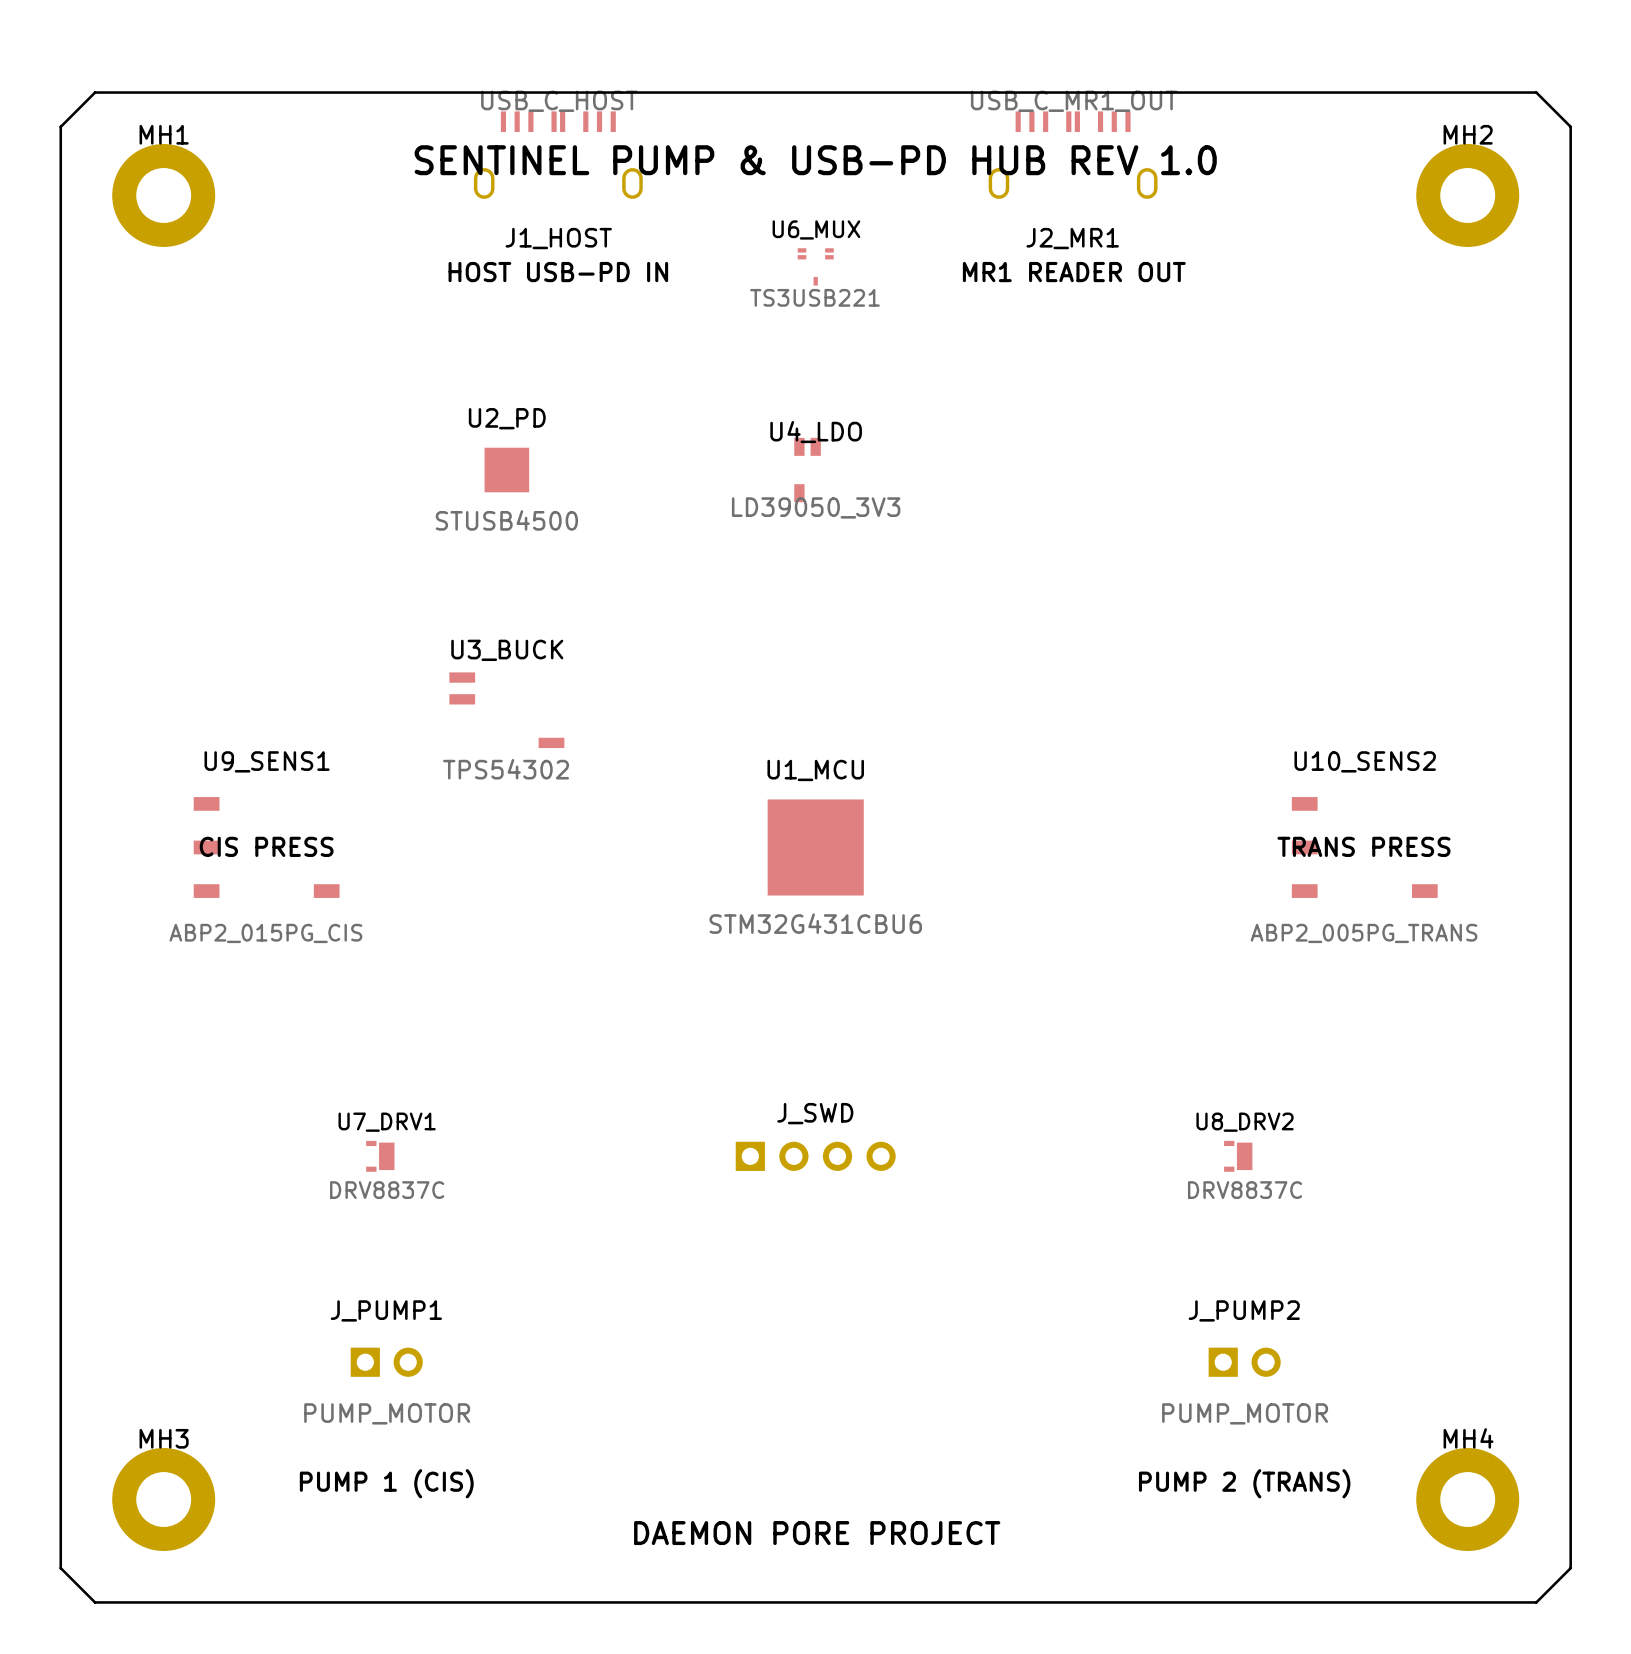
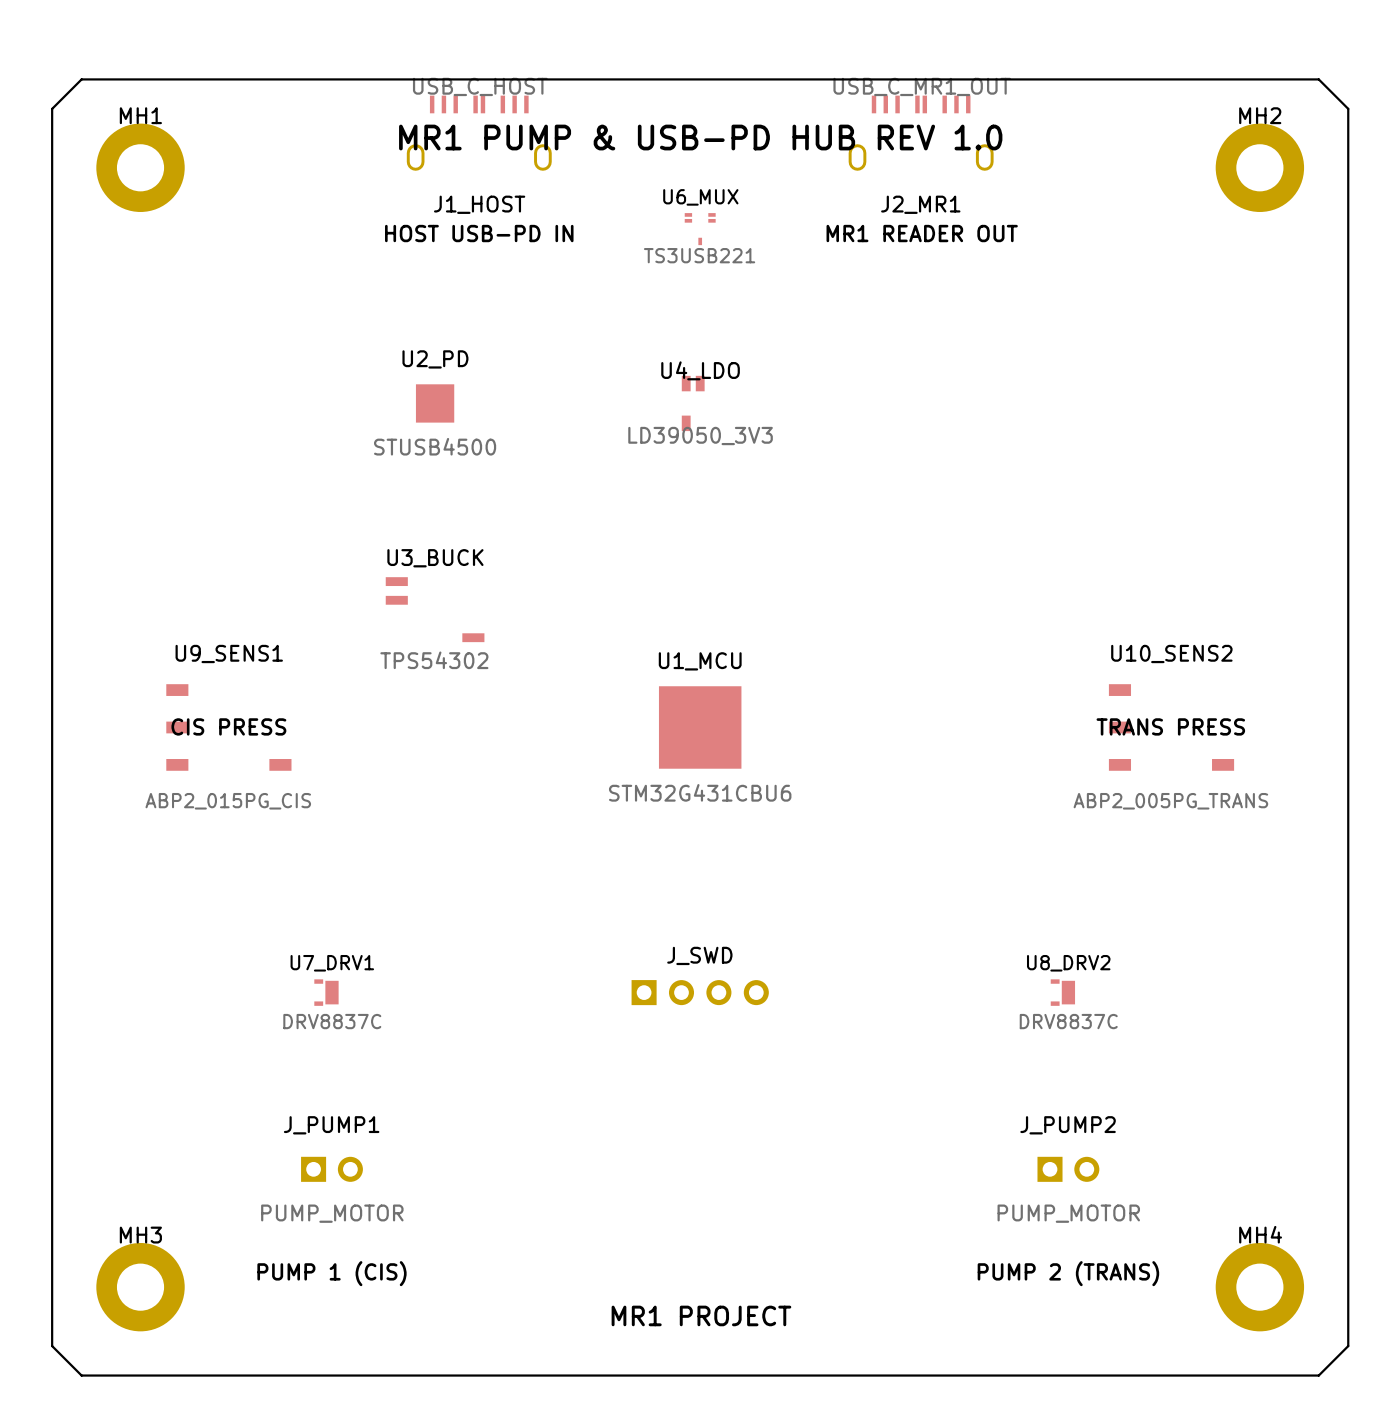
text: SENTINEL PUMP & USB-PD HUB REV 1.0 (815, 160) -> MR1 PUMP & USB-PD HUB REV 1.0 (700, 137)
text: DAEMON PORE PROJECT (817, 1533) -> MR1 PROJECT (701, 1315)

